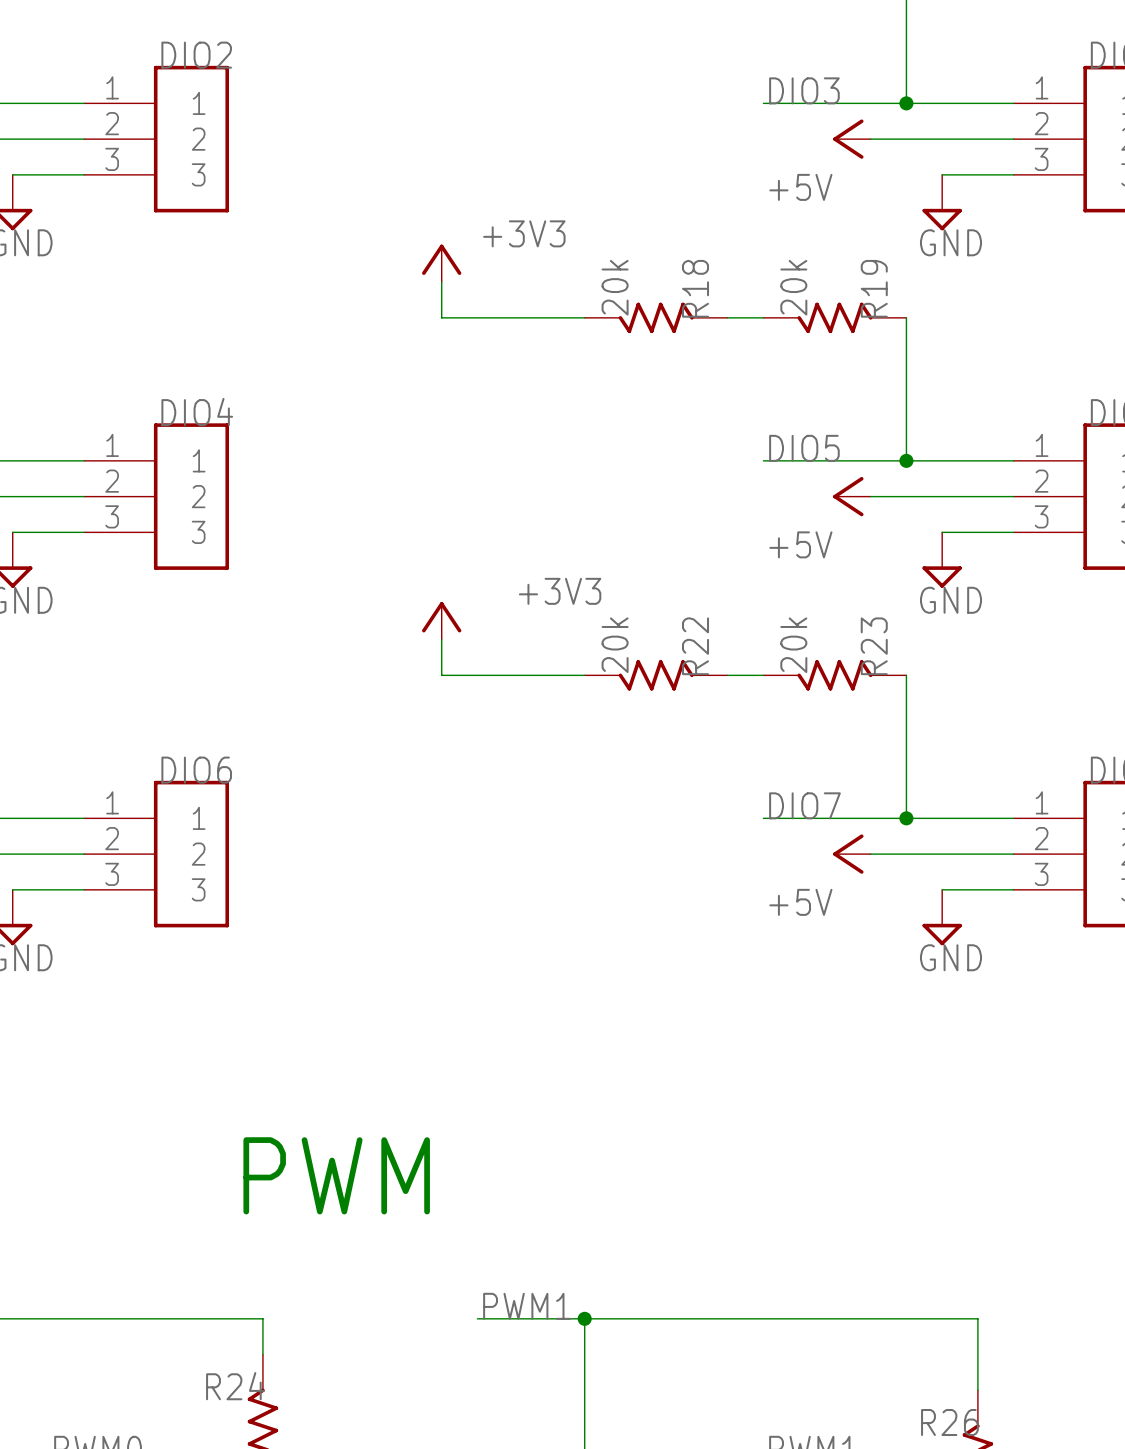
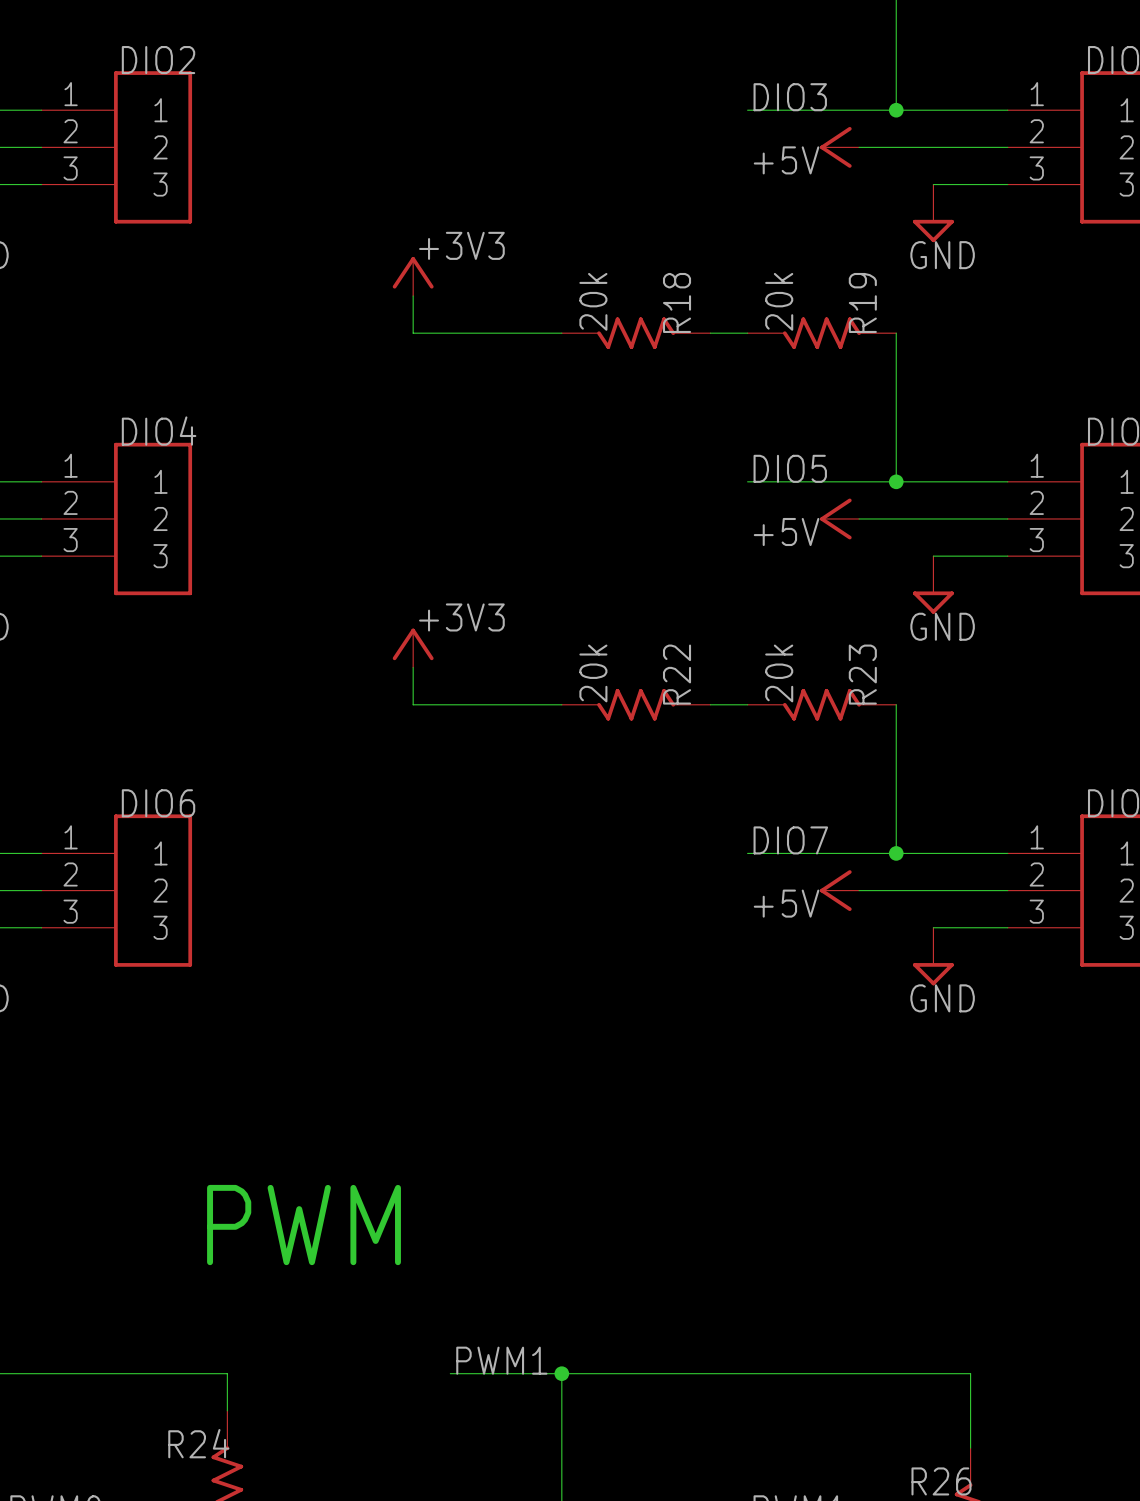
power symbol text position: +5V (800, 187) -> +5V (786, 160)
power symbol text position: +3V3 (524, 233) -> +3V3 (461, 245)
power symbol text position: +5V (800, 544) -> +5V (786, 531)
power symbol text position: +3V3 (560, 591) -> +3V3 (461, 617)
power symbol text position: +5V (800, 902) -> +5V (786, 903)

